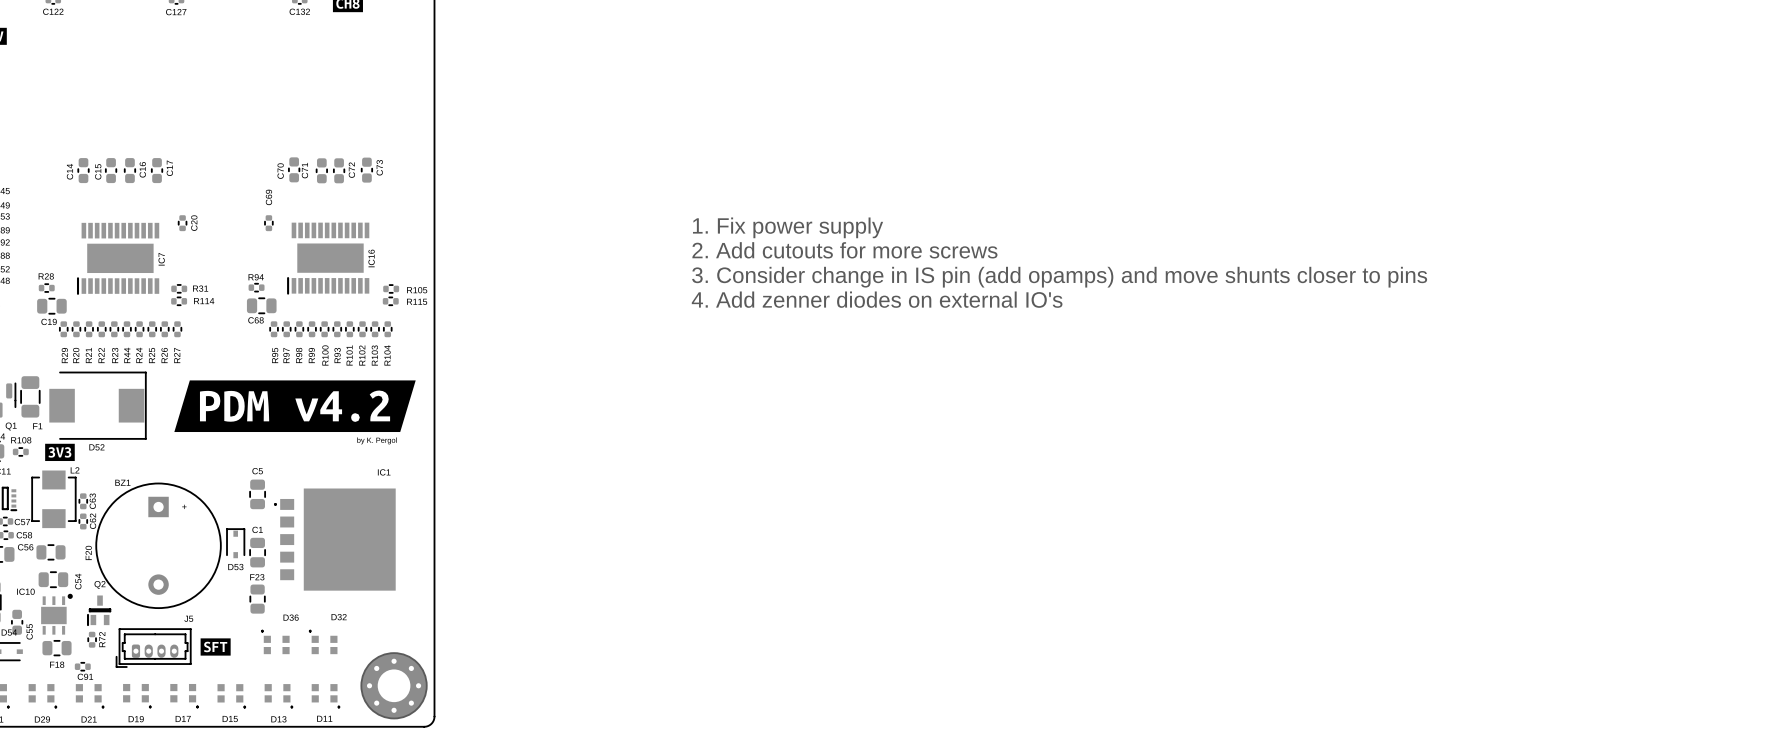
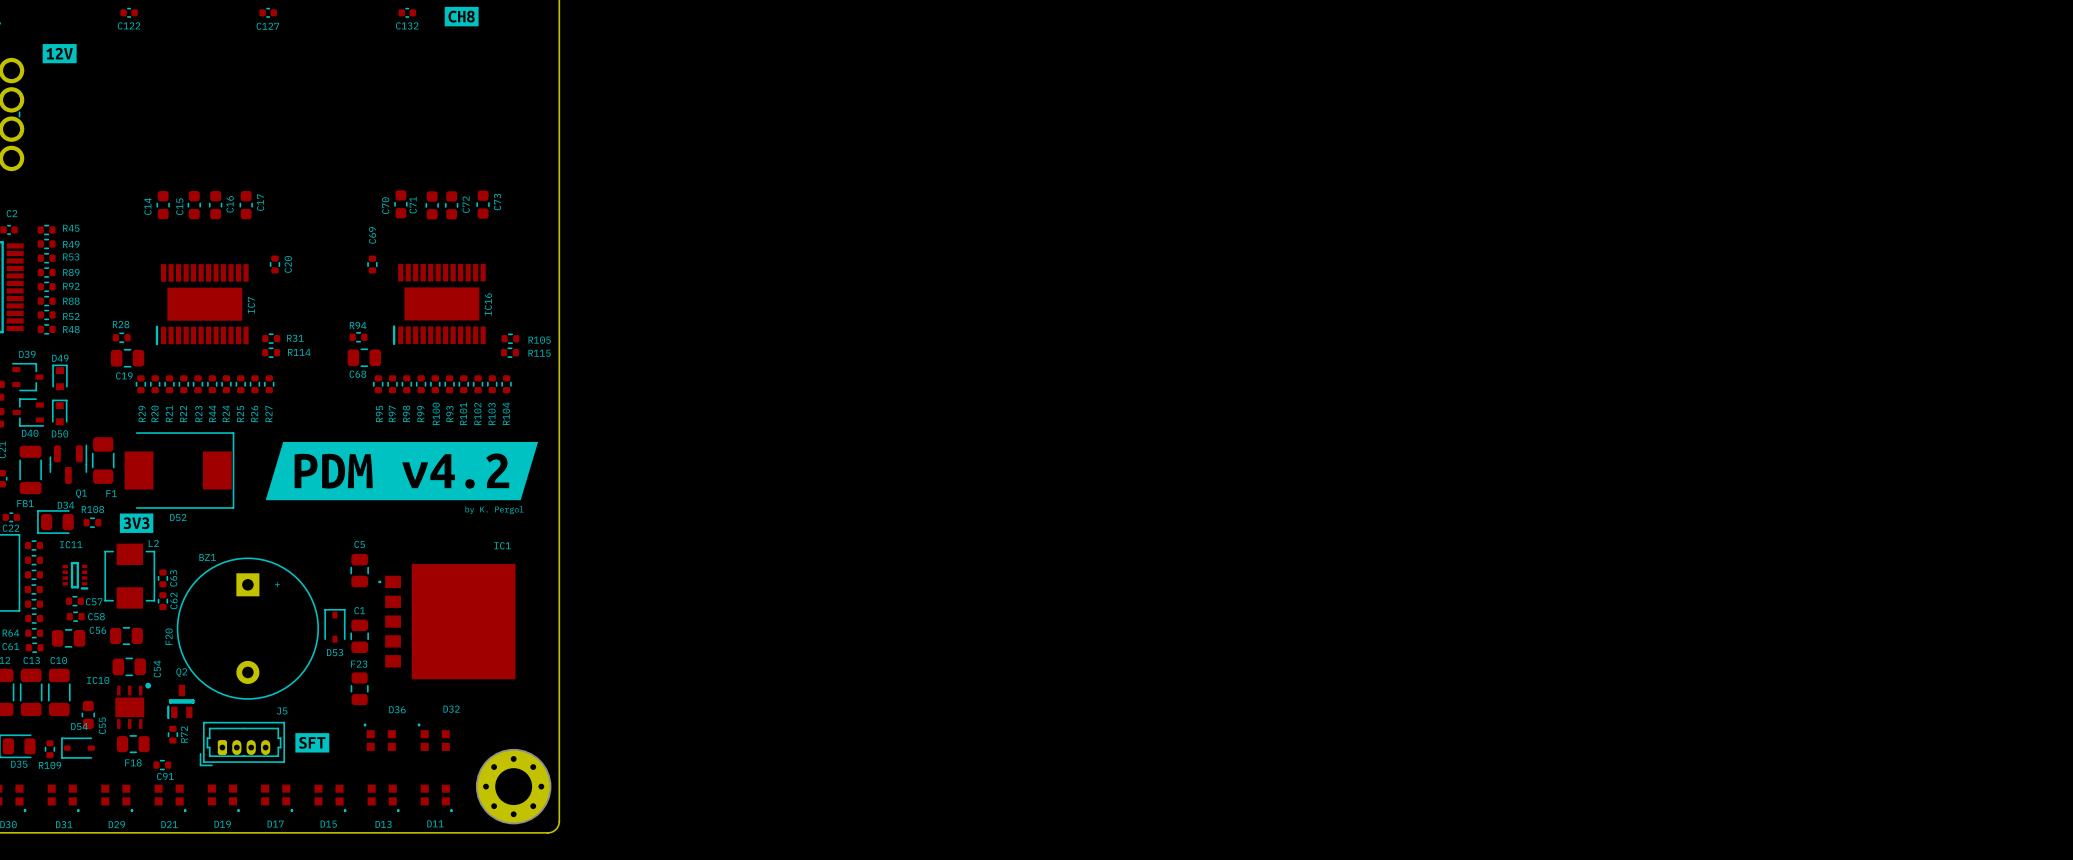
text: 1. Fix power supply (788, 227) -> none
text: 2. Add cutouts for more screws (844, 250) -> none
text: 3. Consider change in IS pin (add opamps) and move shunts closer to pins (1059, 277) -> none
text: 4. Add zenner diodes on external IO's (877, 299) -> none

